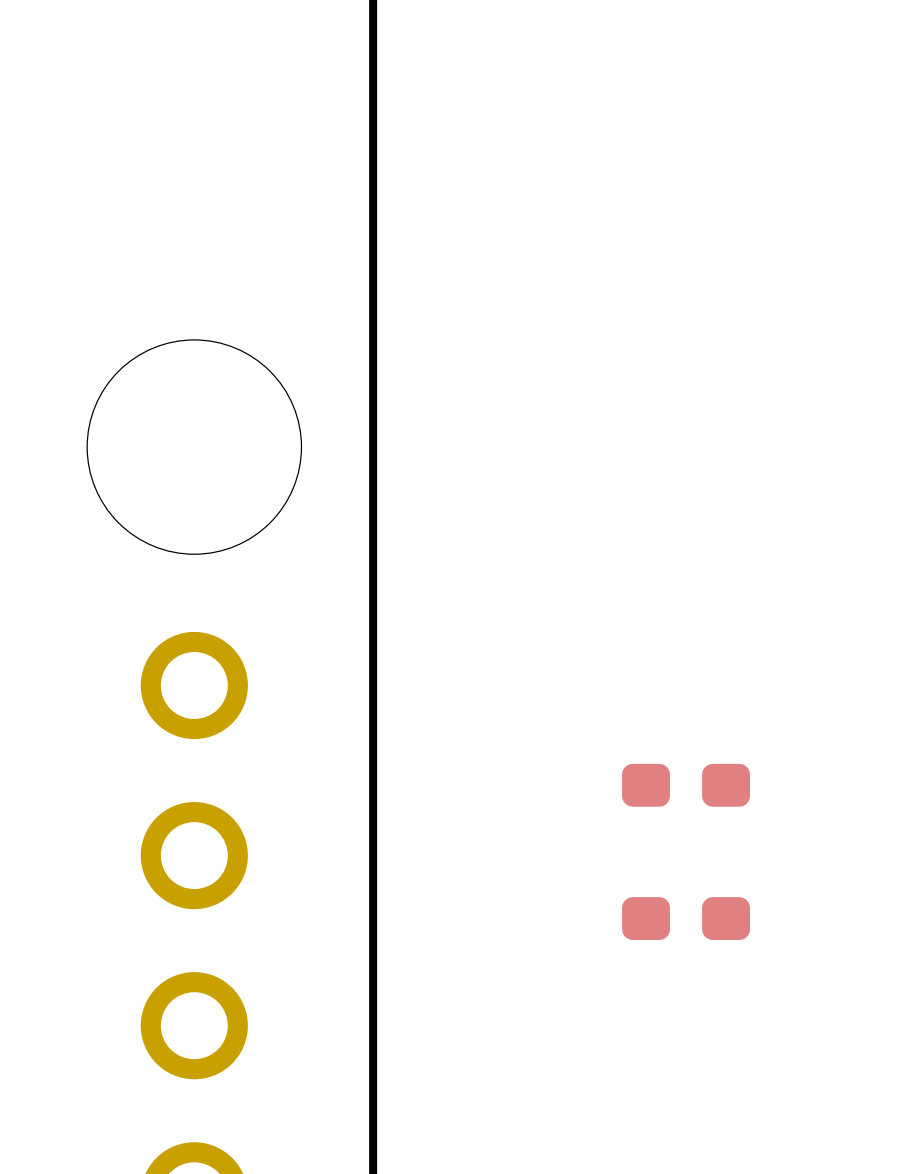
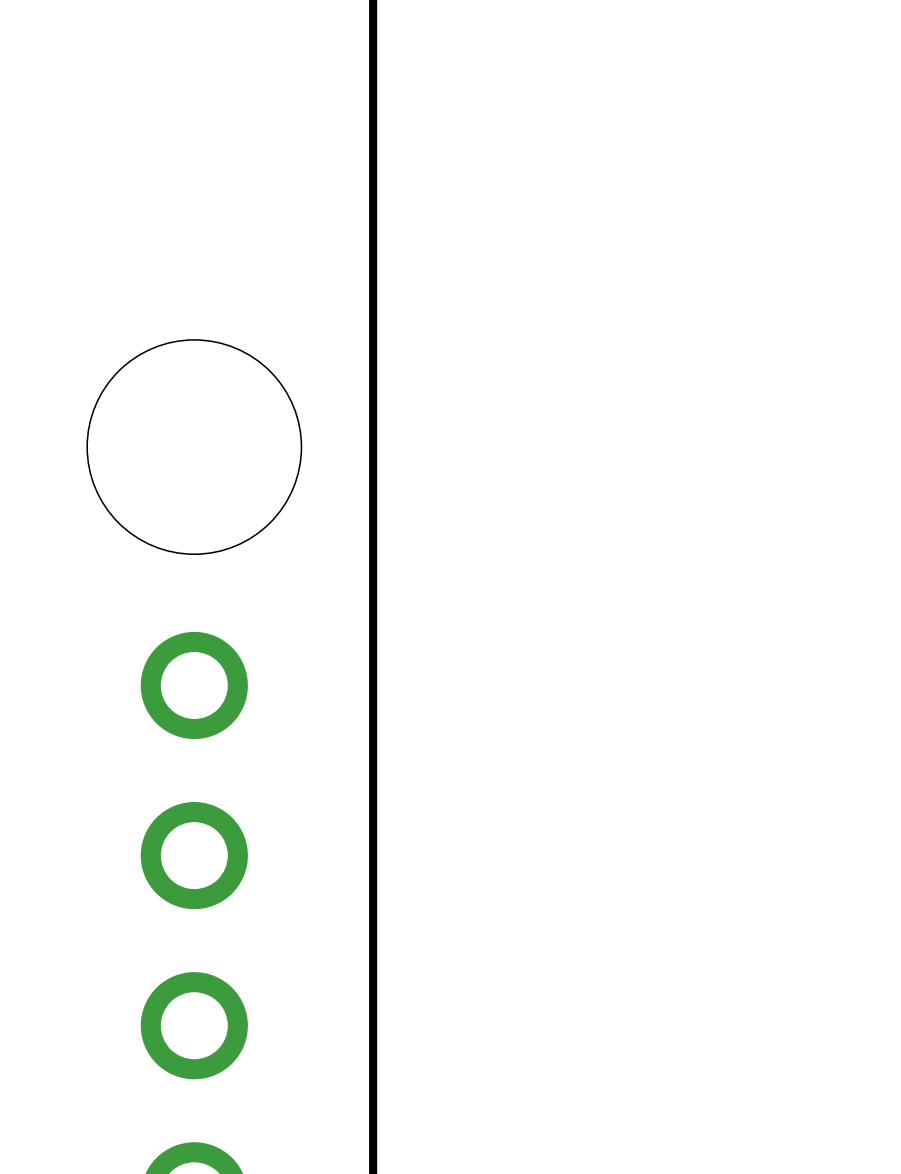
part: (686, 785) -> none
part: (686, 918) -> none

